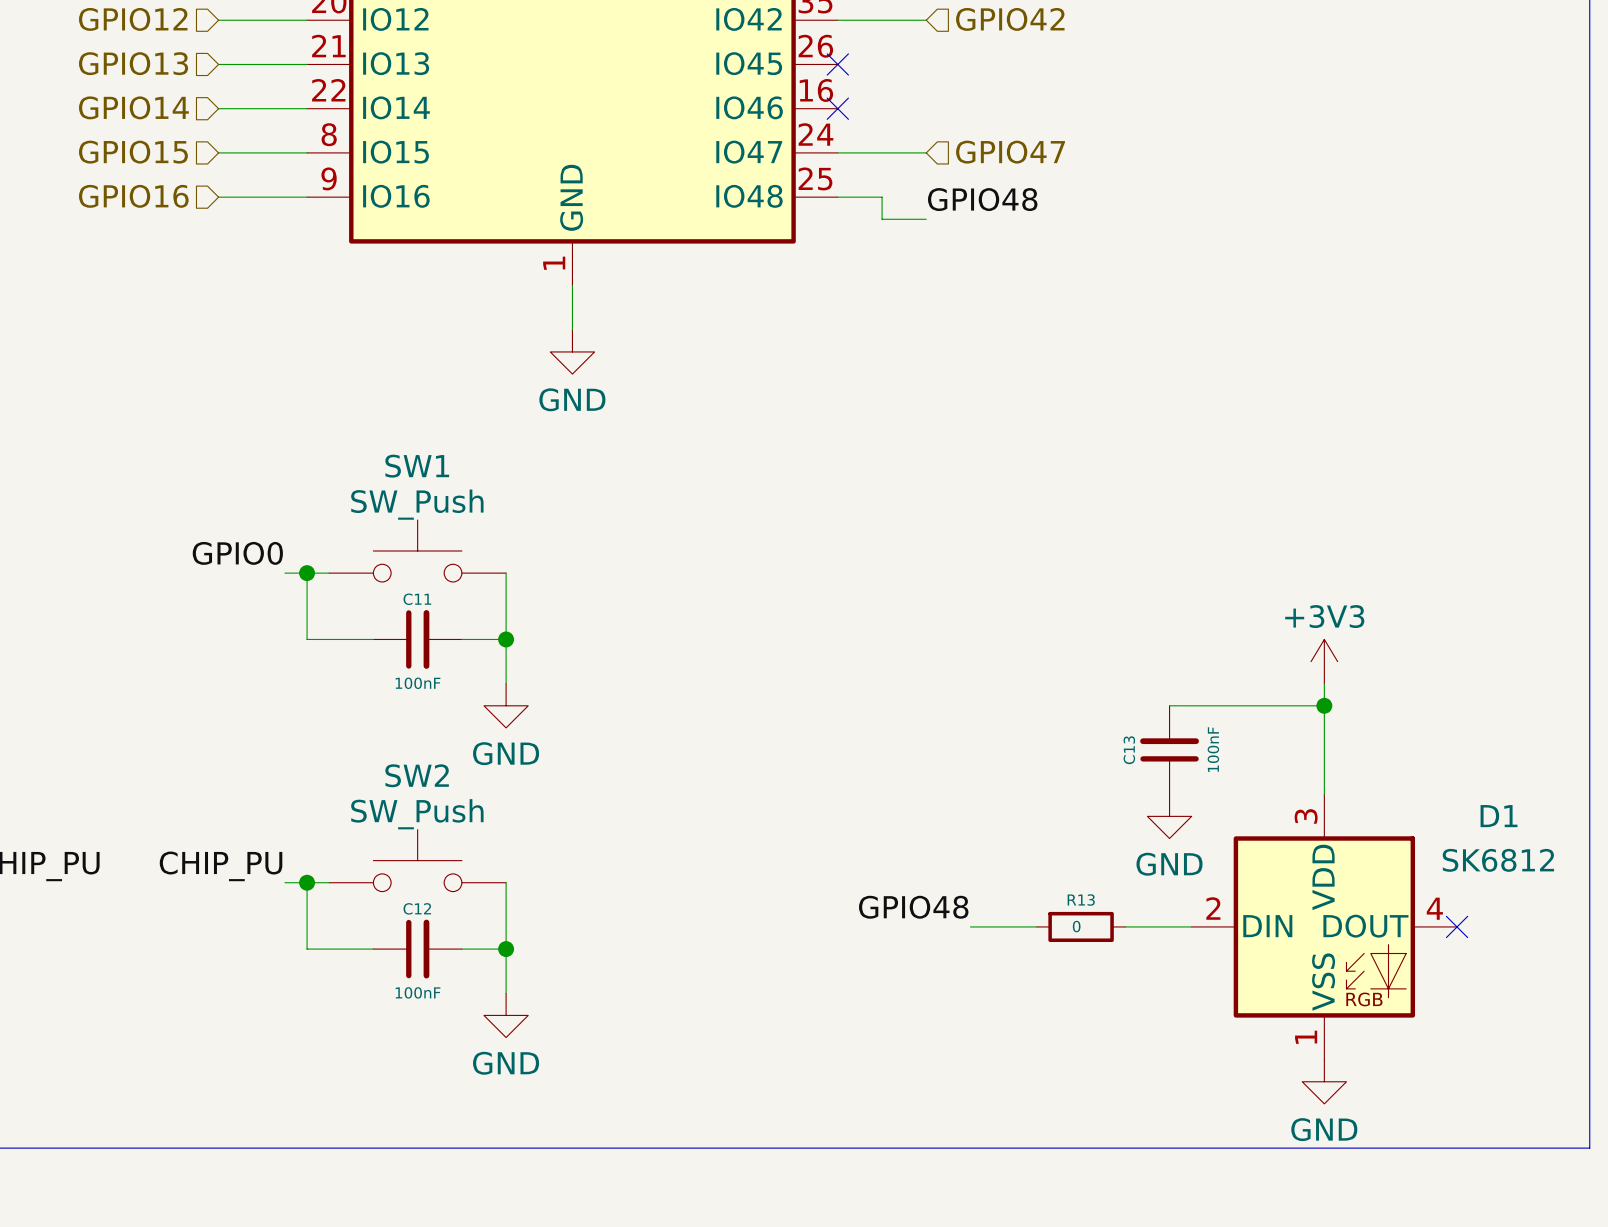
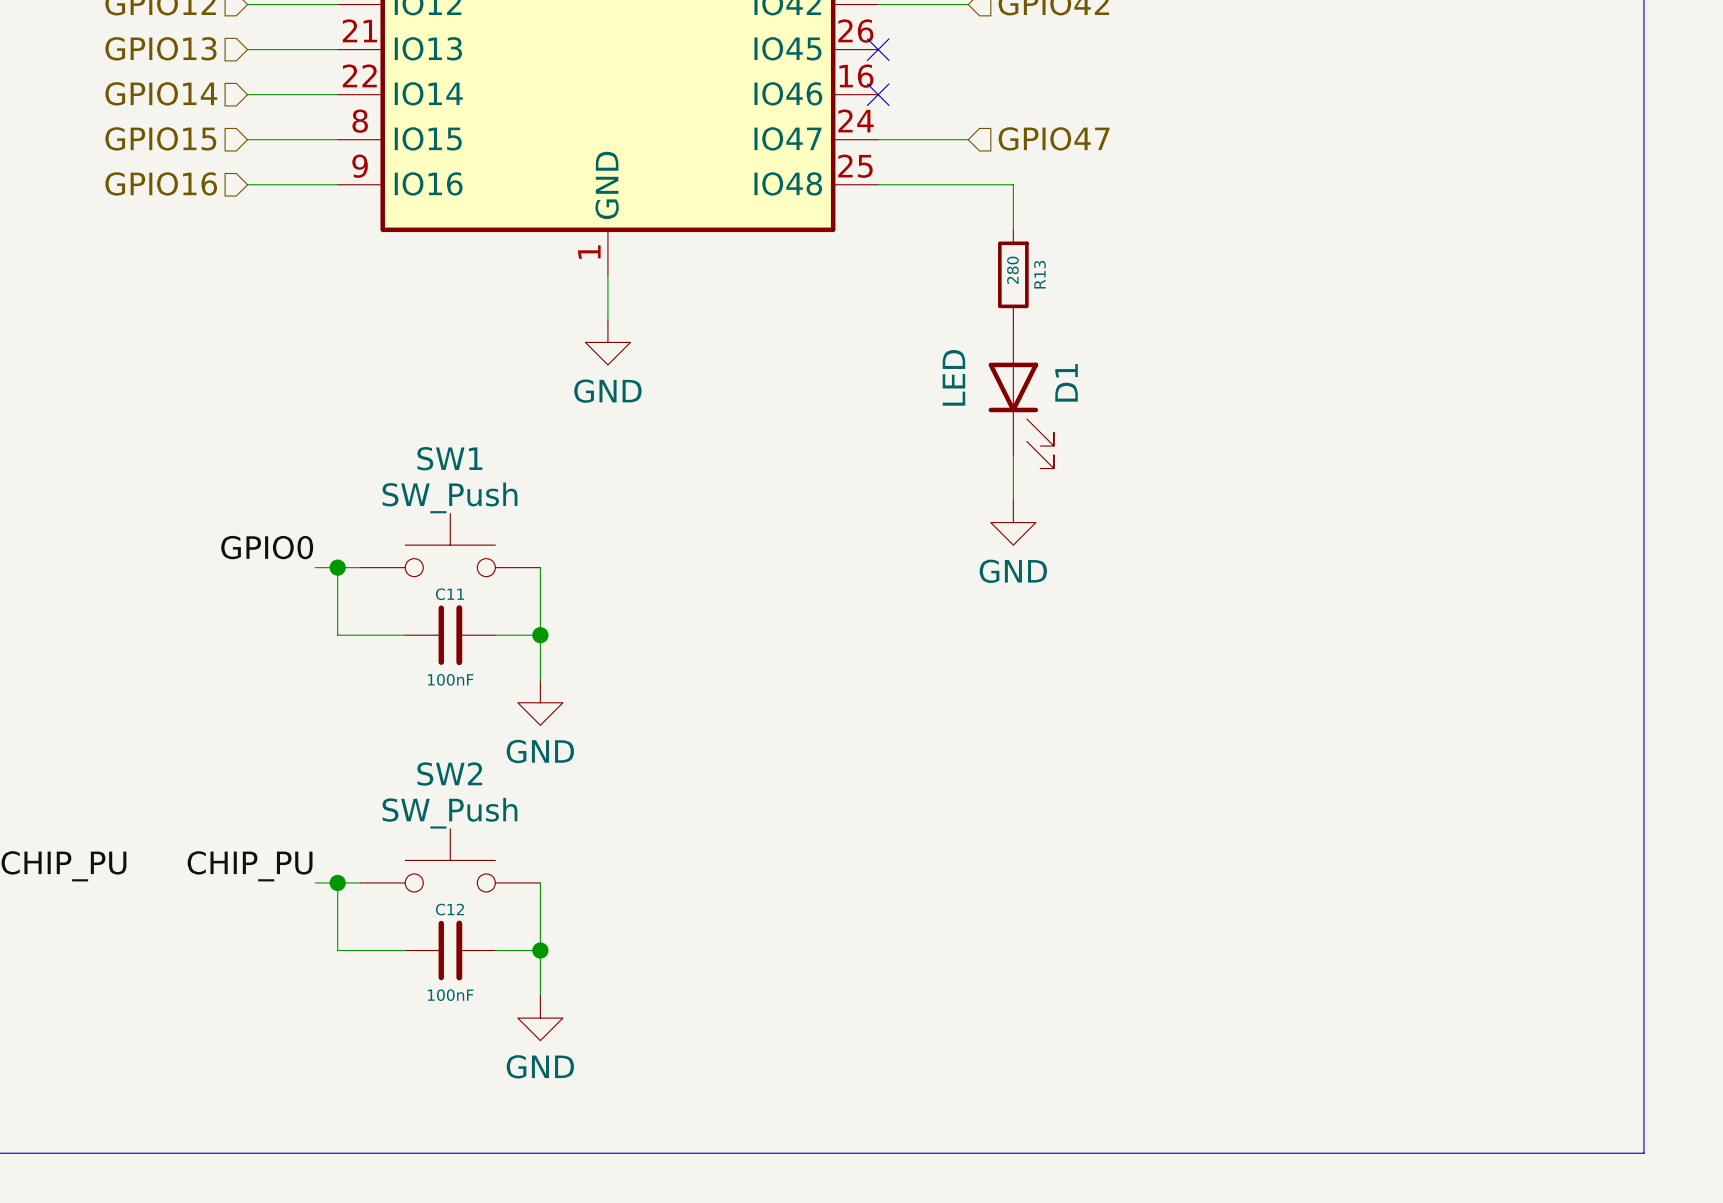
wire: (882, 197) (882, 219) (926, 219) -> (923, 184) (1013, 184) (1013, 229)
label: GPIO48 (982, 199) -> none
wire: none -> (1013, 455) (1013, 500)
power symbol: none -> GND (1013, 522)
power symbol: +3V3 (1324, 661) -> none
wire: (1324, 683) (1324, 794) -> none
wire: (1169, 705) (1324, 705) -> none
junction: (1324, 705) -> none
C13: 100nF (1169, 750) -> none
D1 symbol: [1191, 794, 1458, 1060] -> [988, 319, 1054, 469]
power symbol: GND (1169, 816) -> none
D1 name position: D1 (1499, 816) -> D1 (1066, 382)
D1 value: SK6812 (1498, 860) -> LED (953, 377)
label: GPIO48 (913, 907) -> none
wire: (970, 926) (1036, 926) -> none
R13 value: 0 (1076, 926) -> 280 (1012, 270)
R13 rotation: 0° (1081, 926) -> 90° clockwise (1013, 274)
R13 position: (1081, 926) -> (1013, 274)
wire: (1125, 926) (1191, 926) -> none
no-connect mark: (1457, 926) -> none
power symbol: GND (1324, 1081) -> none

